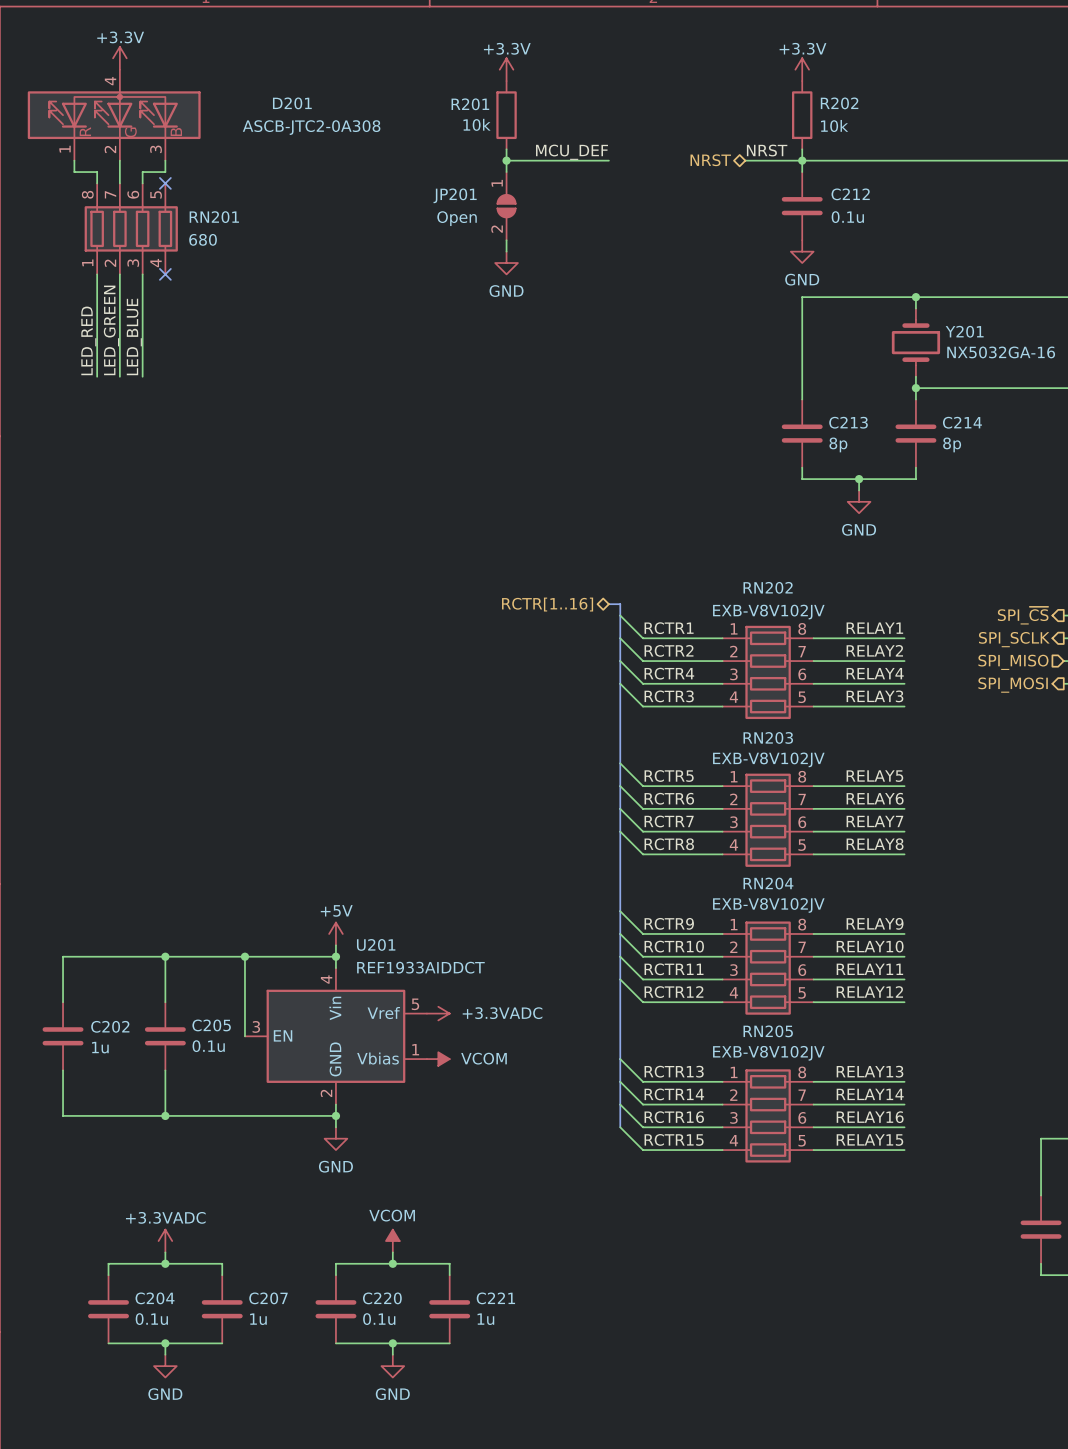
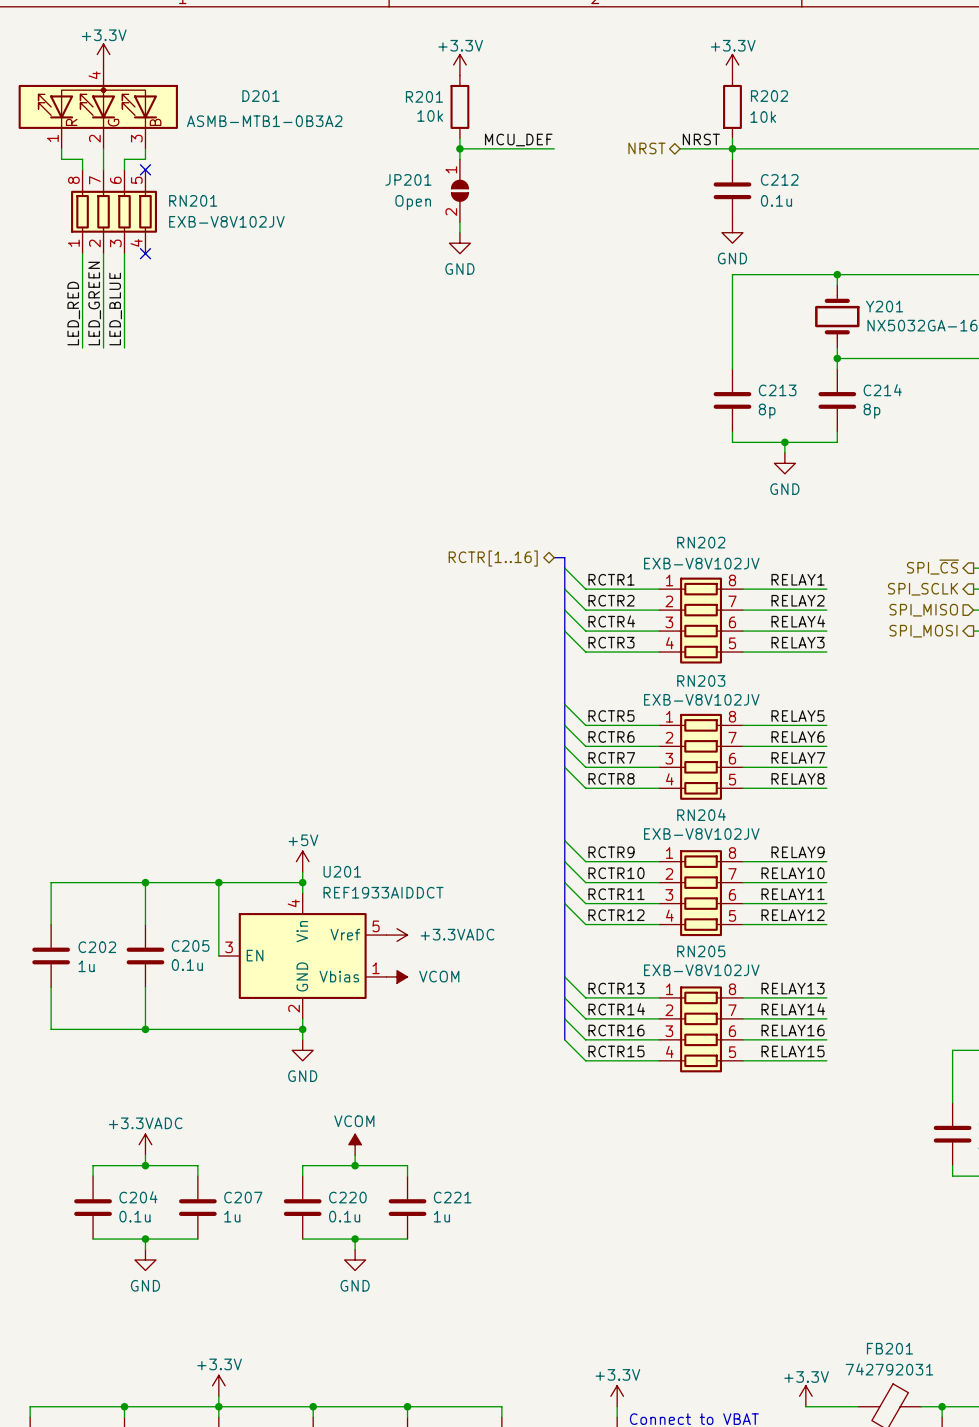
D201 value: ASCB-JTC2-0A308 (311, 127) -> ASMB-MTB1-0B3A2 (264, 121)
RN201 value: 680 (203, 239) -> EXB-V8V102JV (226, 221)

